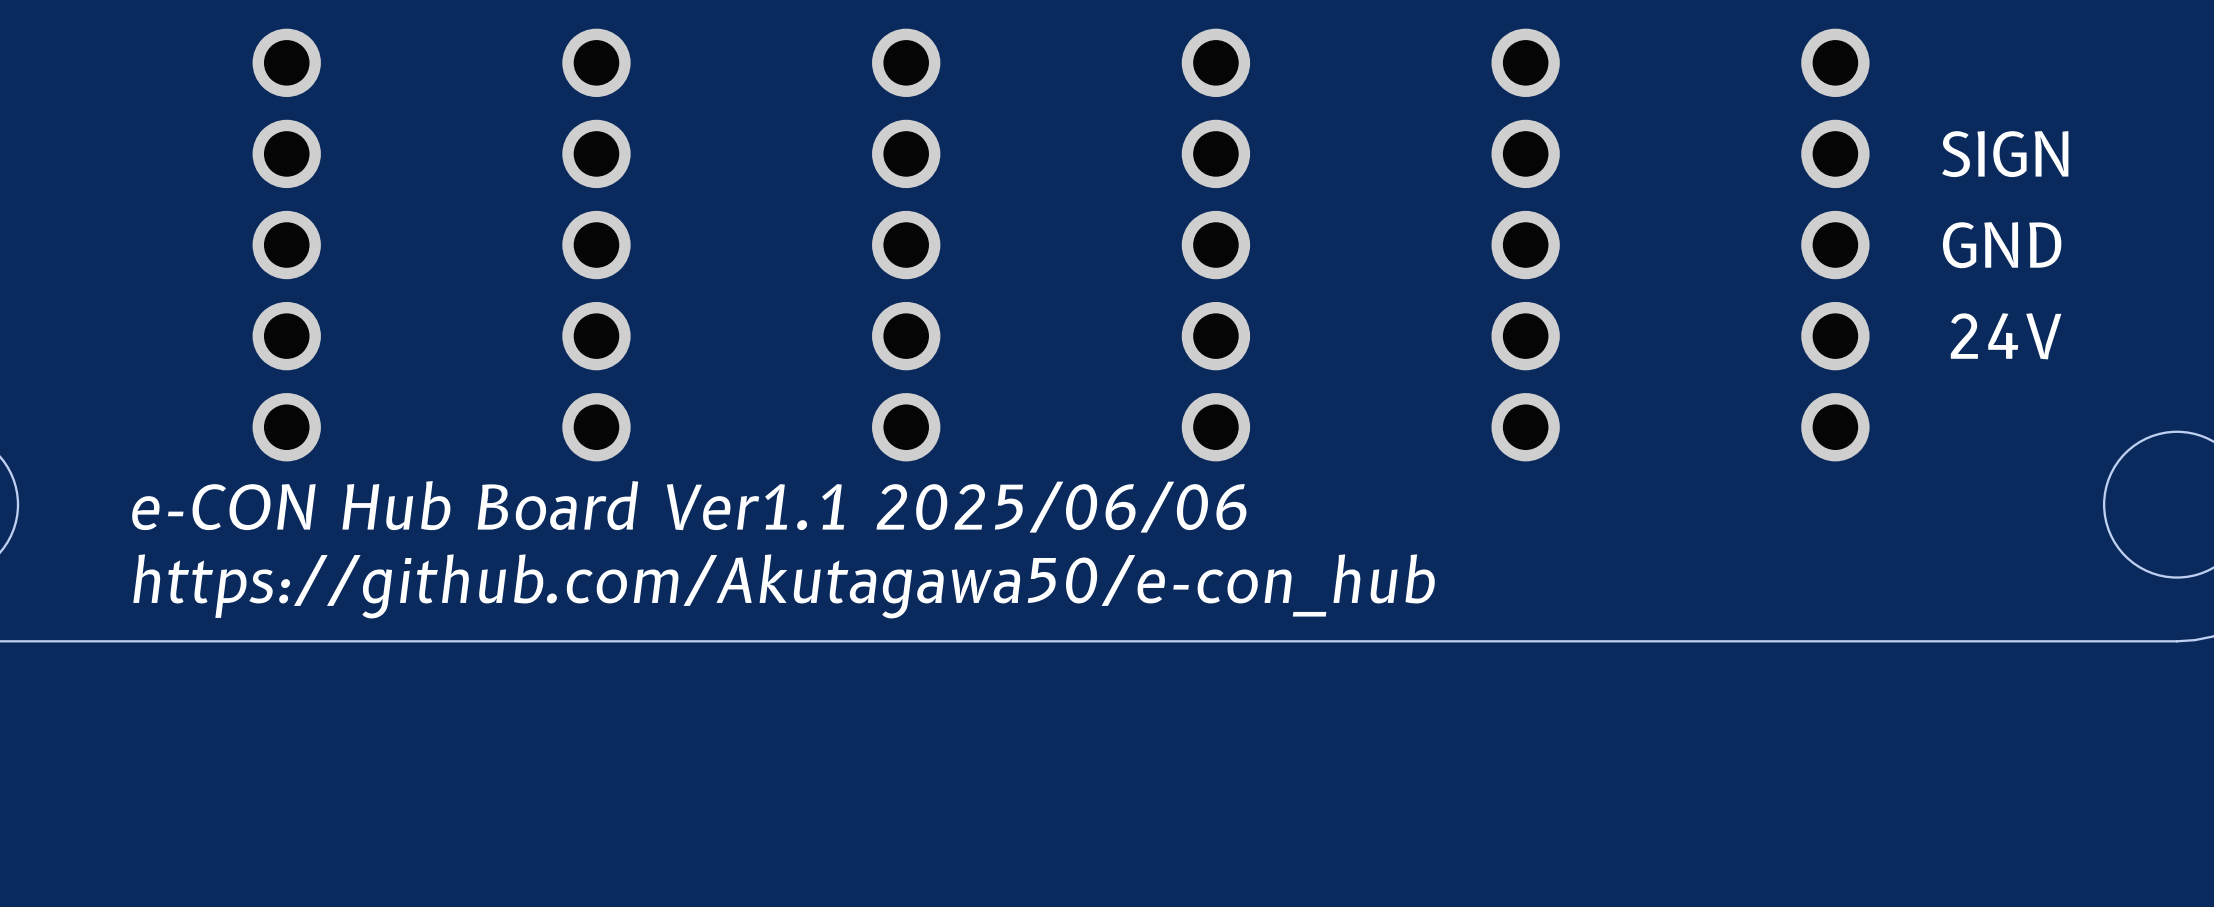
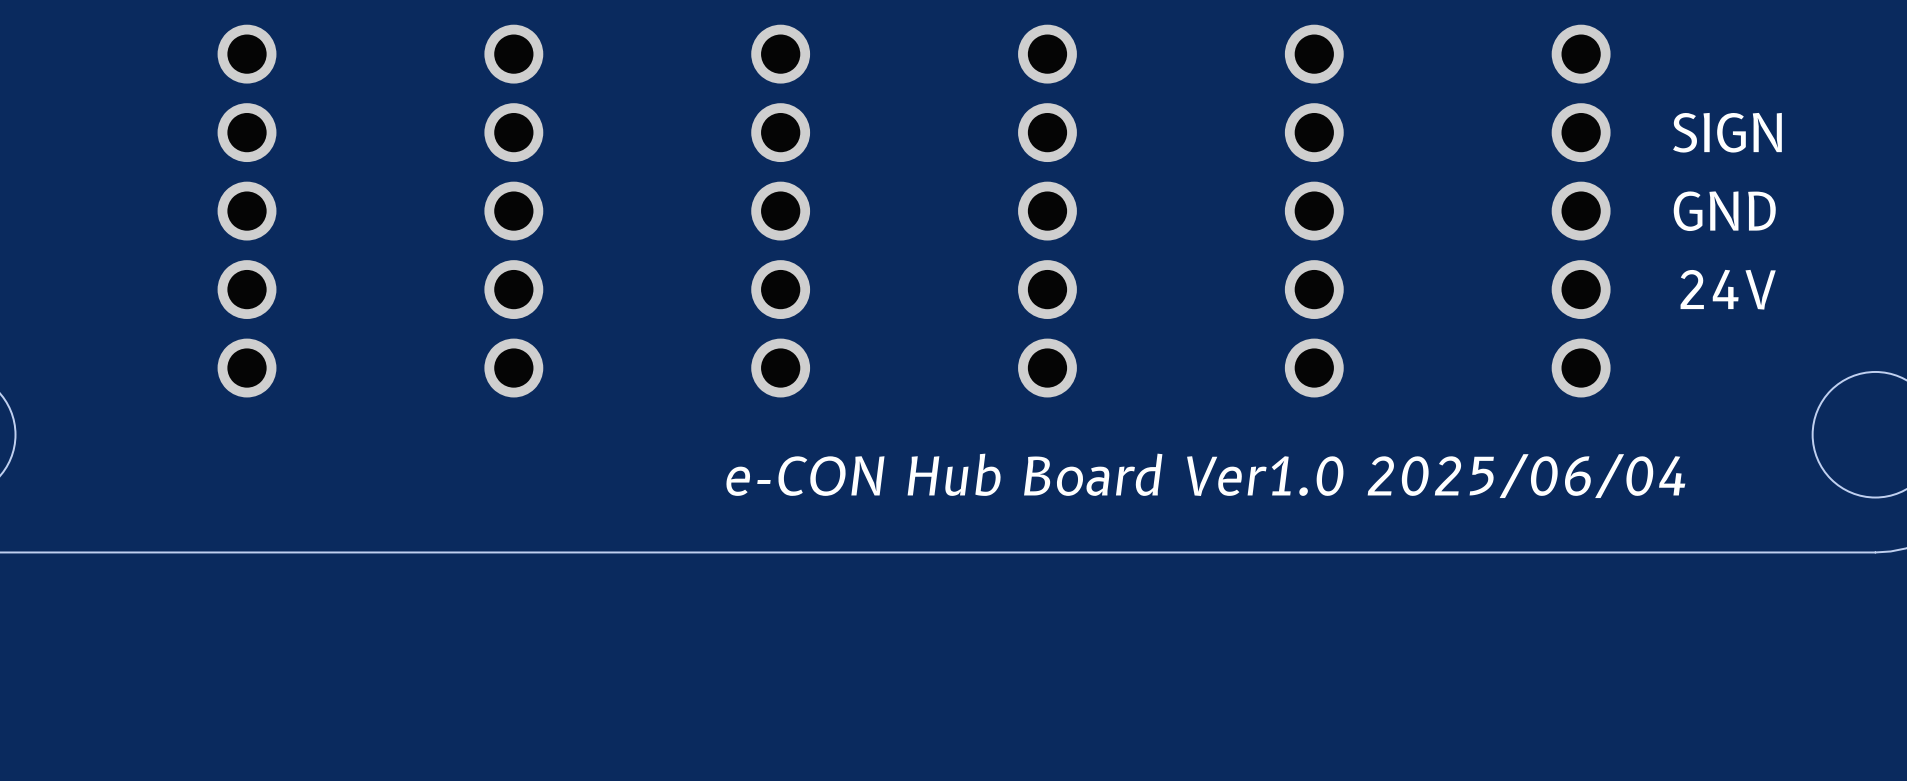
text: e-CON Hub Board Ver1.1 2025/06/06 (689, 506) -> none
text: none -> e-CON Hub Board Ver1.0 2025/06/04 (1205, 475)
text: https://github.com/Akutagawa50/e-con_hub (784, 586) -> none

